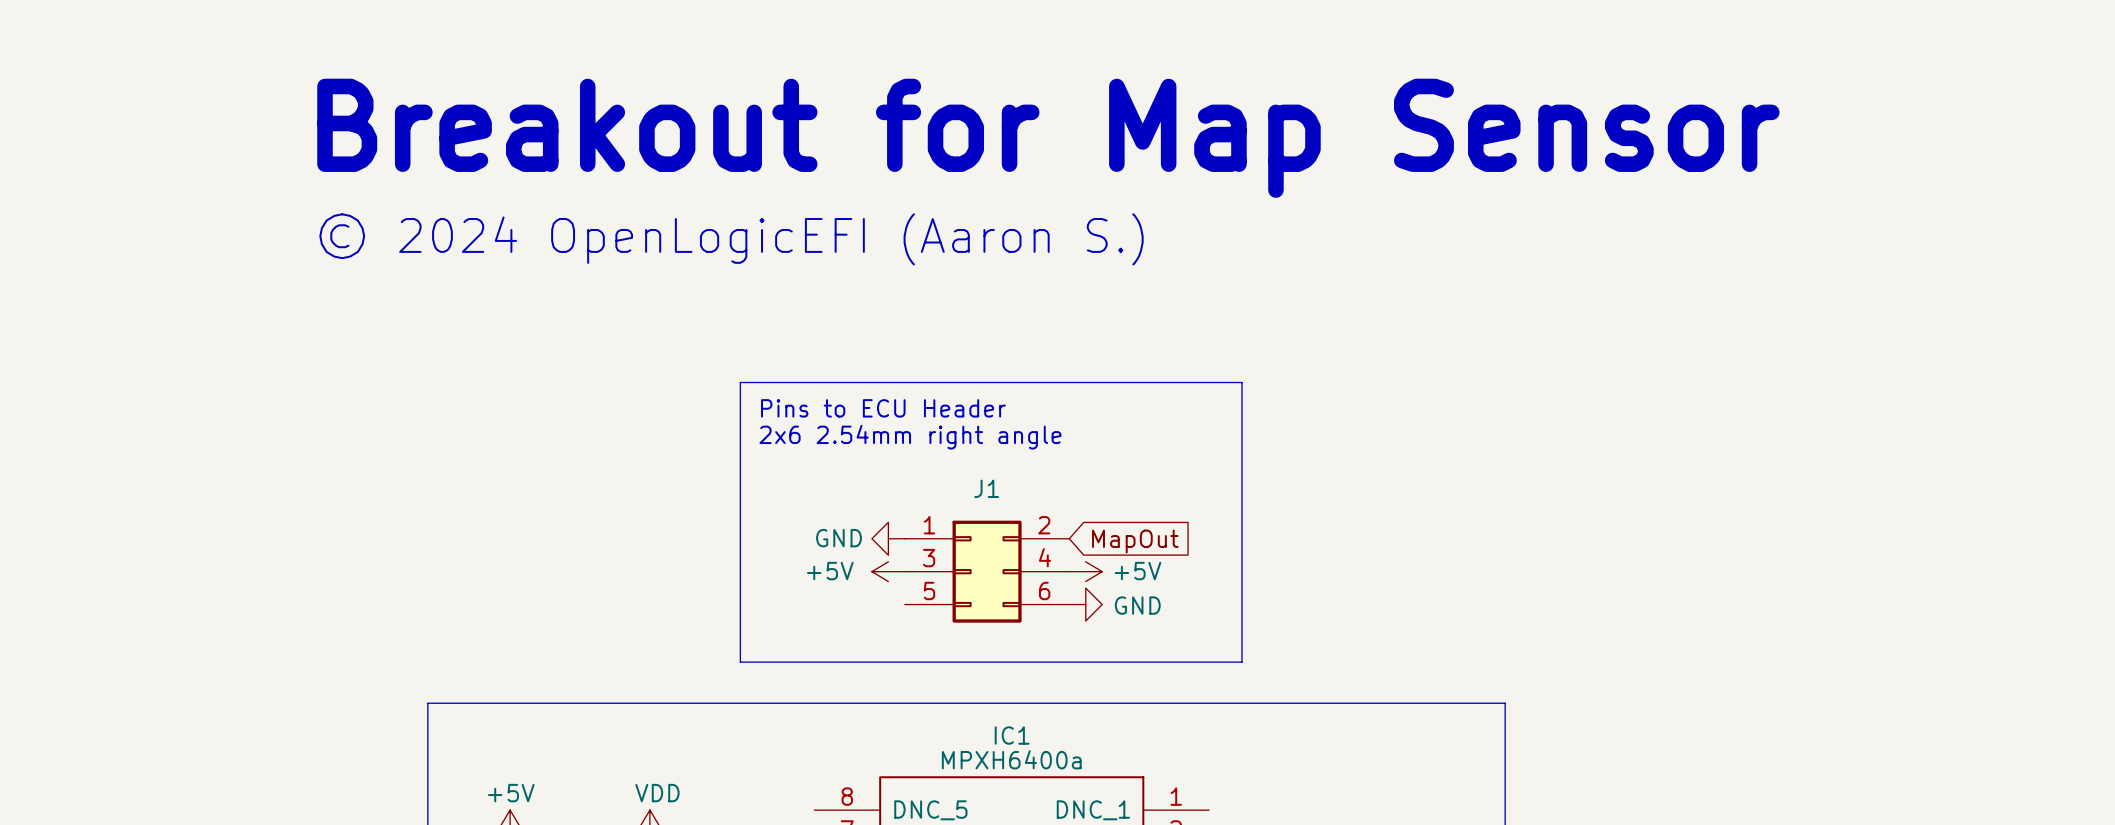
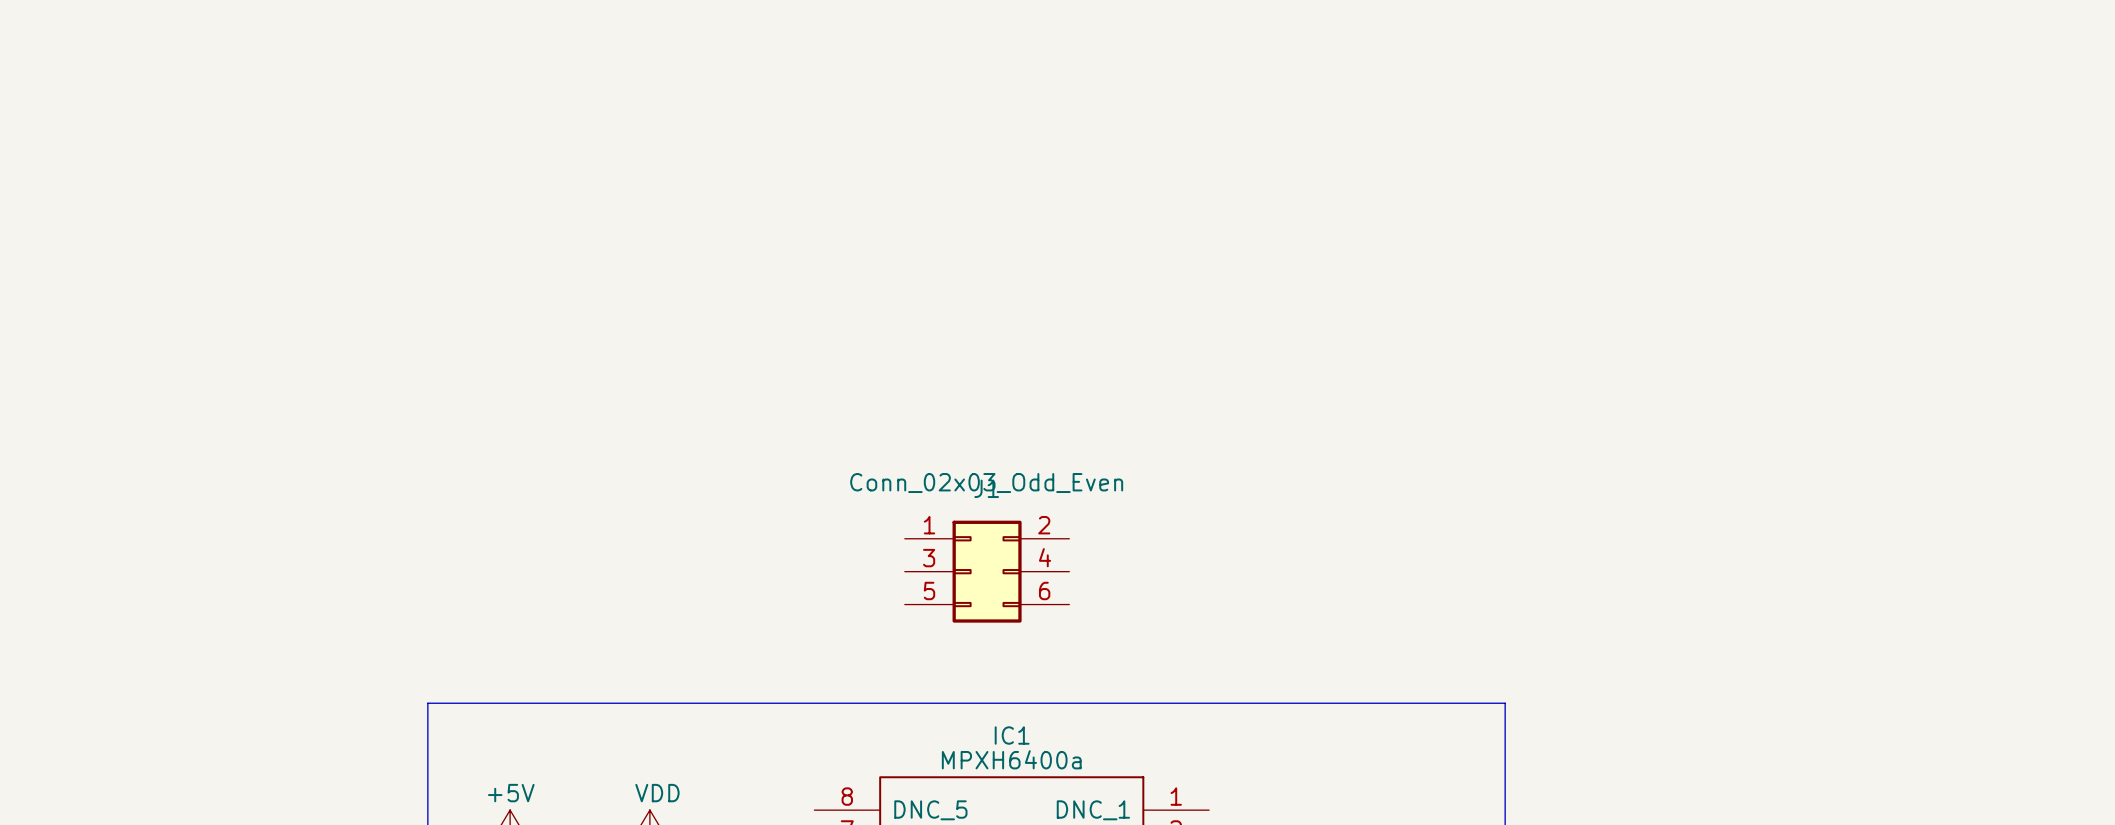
text: Breakout for Map Sensor (1048, 138) -> none
text: © 2024 OpenLogicEFI (Aaron S.) (731, 239) -> none
line: (740, 382) (1242, 382) (1242, 662) (740, 662) (740, 382) -> none
text: Pins to ECU Header (883, 408) -> none
text: 2x6 2.54mm right angle (910, 437) -> none
J1 value: none -> Conn_02x03_Odd_Even (986, 483)
power symbol: GND (888, 538) -> none
global label: MapOut (1135, 541) -> none
power symbol: +5V (888, 571) -> none
power symbol: +5V (1085, 571) -> none
power symbol: GND (1085, 604) -> none

